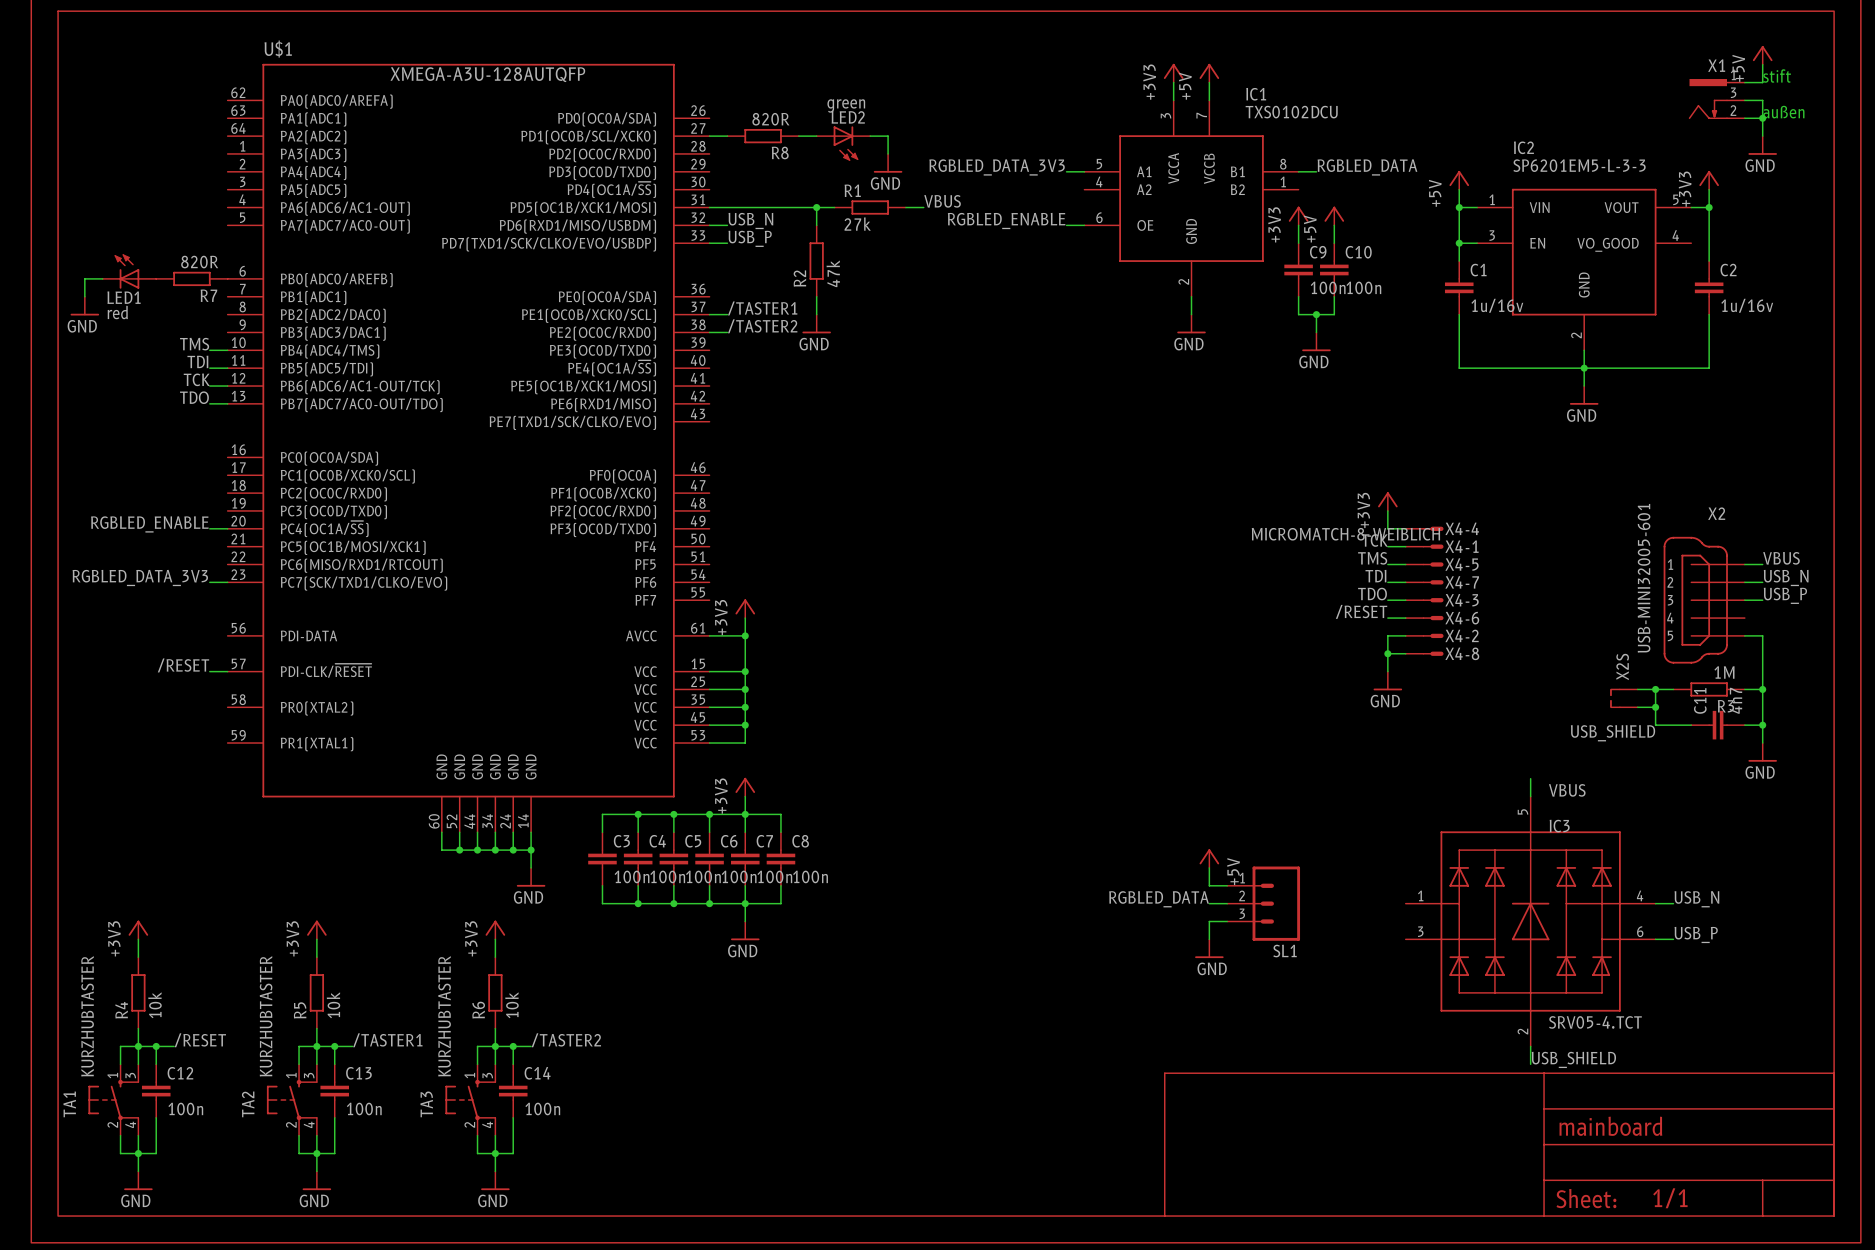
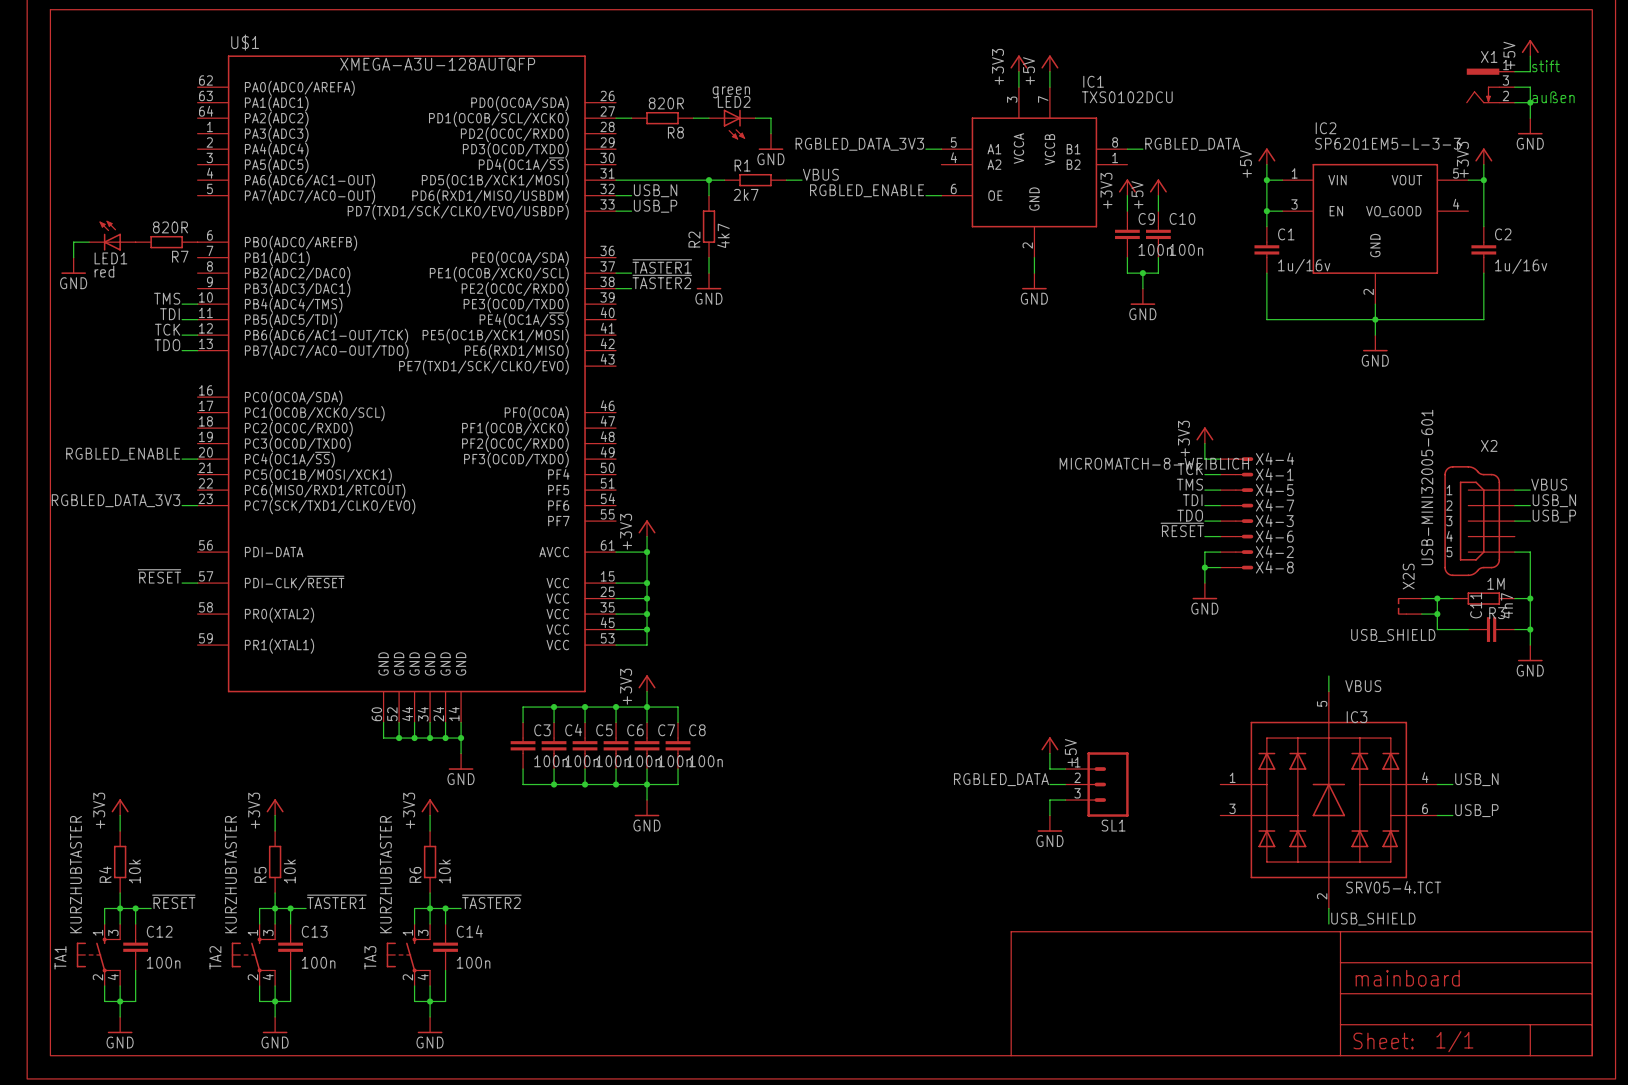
R1 value: 27k (857, 224) -> 2k7 (746, 194)
R2 value: 47k (833, 273) -> 4k7 (723, 235)
label: /TASTER1 (762, 308) -> ~{TASTER1} (662, 266)
label: /TASTER2 (762, 326) -> ~{TASTER2} (662, 281)
label: /RESET (1361, 611) -> ~{RESET} (1182, 529)
label: /RESET (183, 665) -> ~{RESET} (159, 576)
label: /RESET (200, 1040) -> ~{RESET} (173, 901)
label: /TASTER1 (387, 1040) -> ~{TASTER1} (336, 901)
label: /TASTER2 (566, 1040) -> ~{TASTER2} (491, 901)

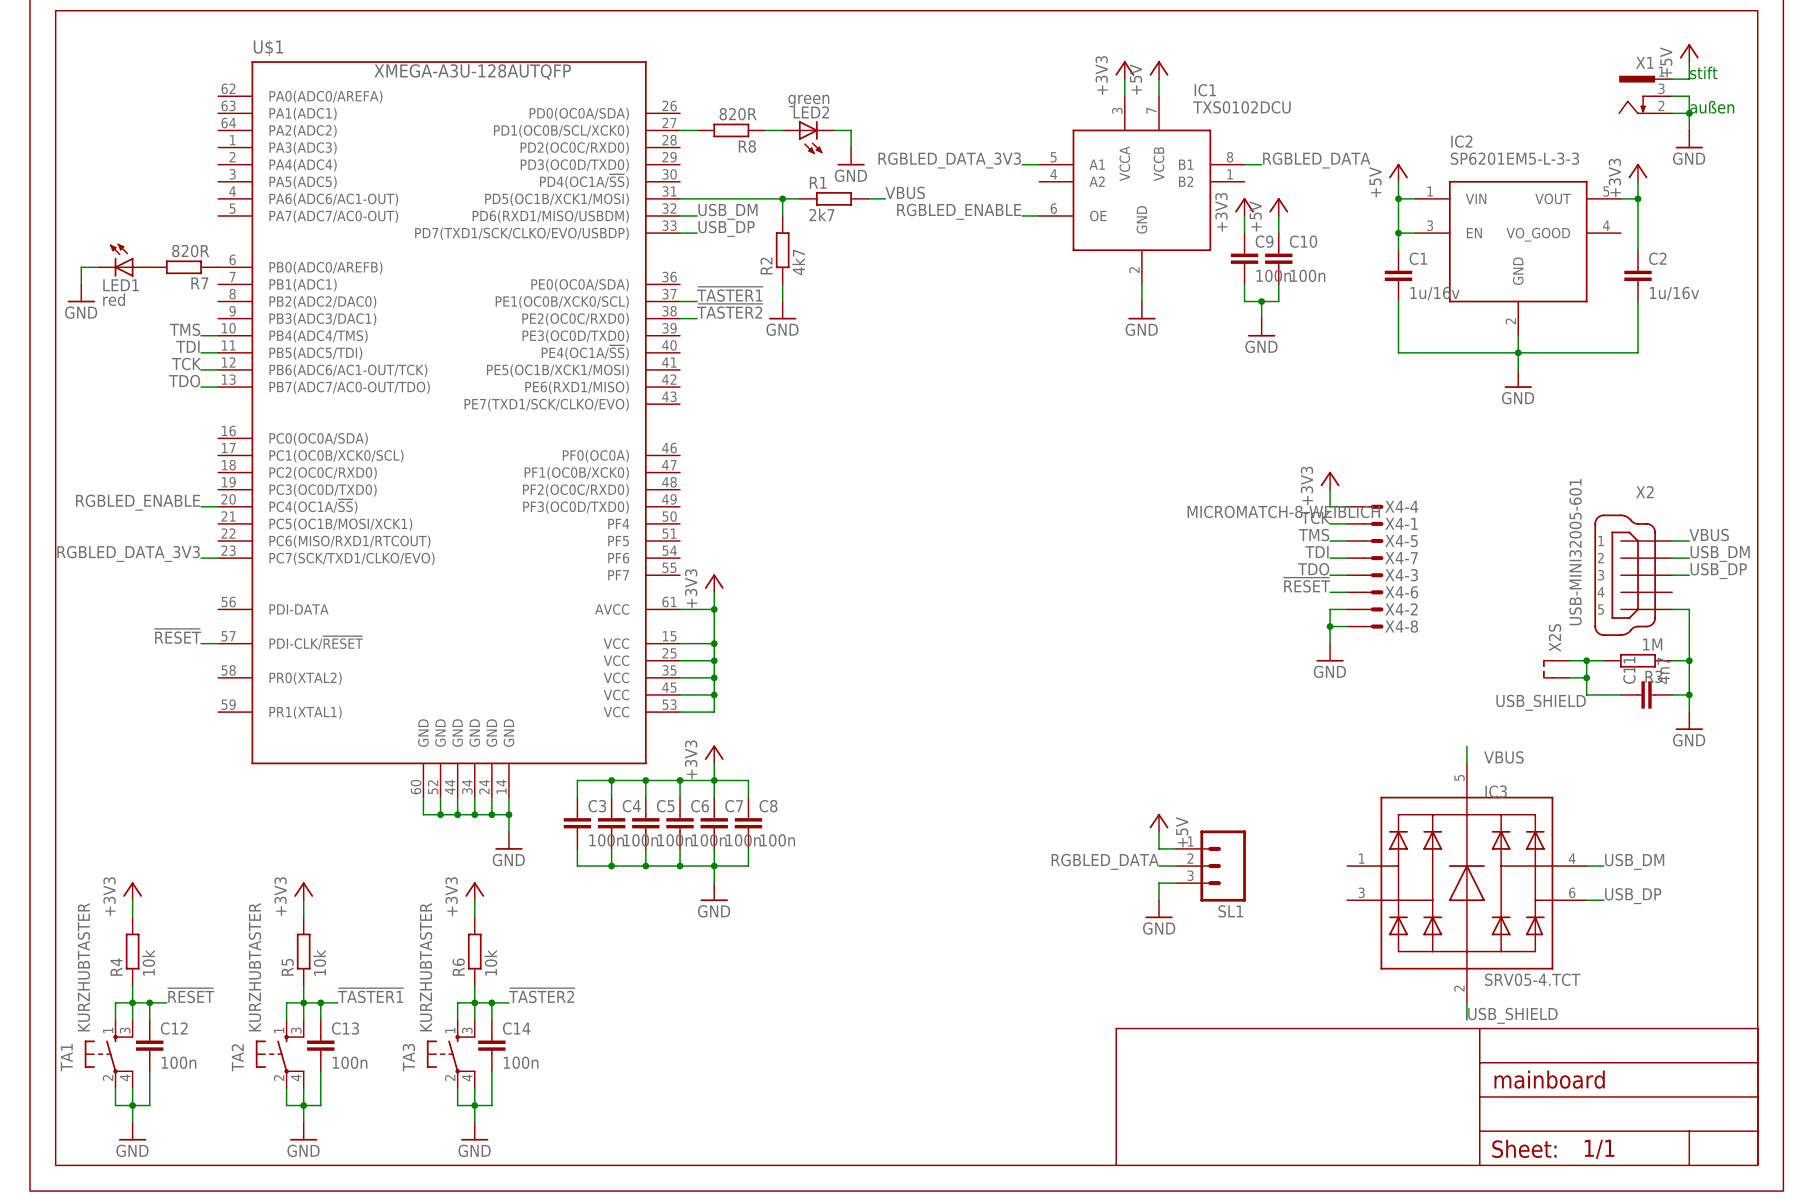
label: USB_N (655, 190) -> USB_DM (727, 211)
label: USB_P (655, 206) -> USB_DP (726, 228)
label: USB_N (1554, 500) -> USB_DM (1720, 553)
label: USB_P (1554, 516) -> USB_DP (1718, 571)
label: USB_N (1476, 779) -> USB_DM (1634, 861)
label: USB_P (1476, 810) -> USB_DP (1633, 896)

